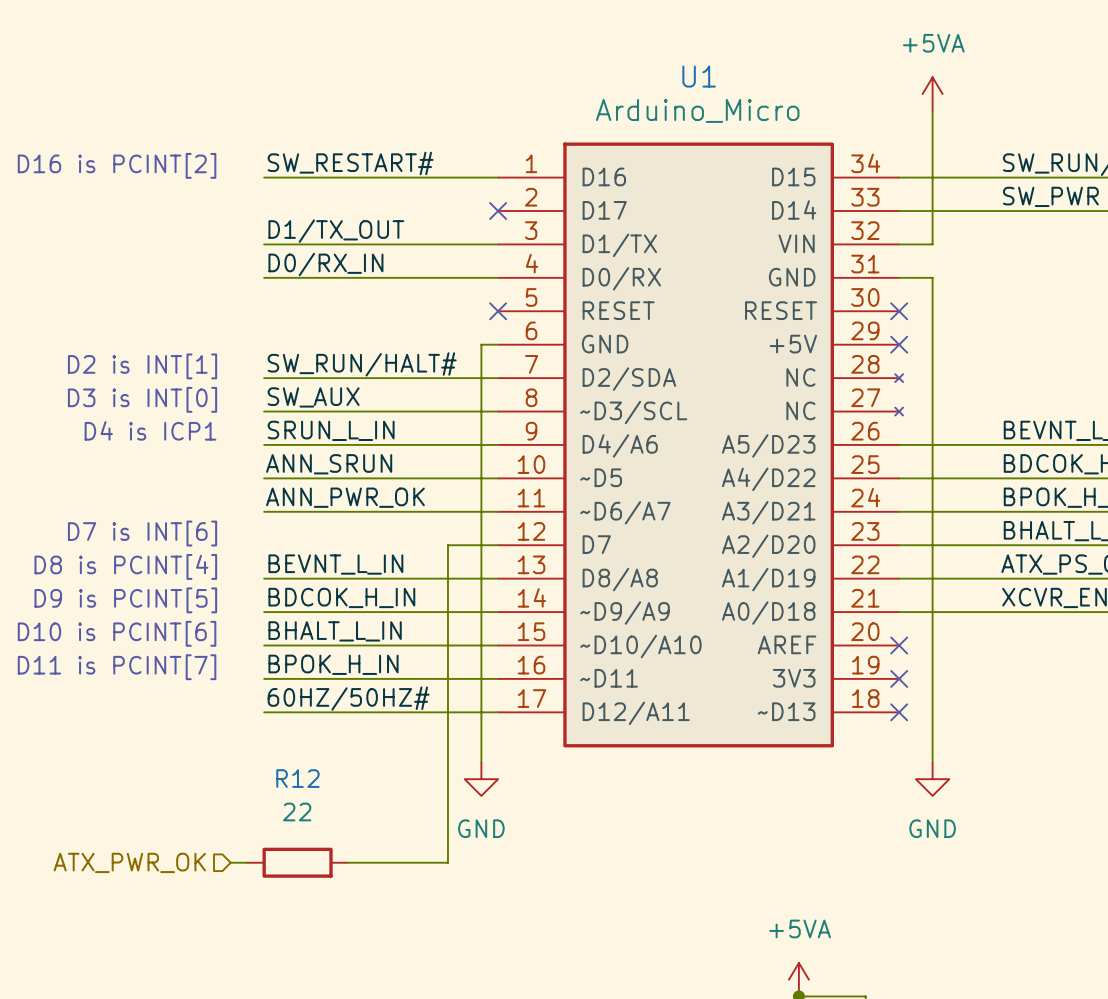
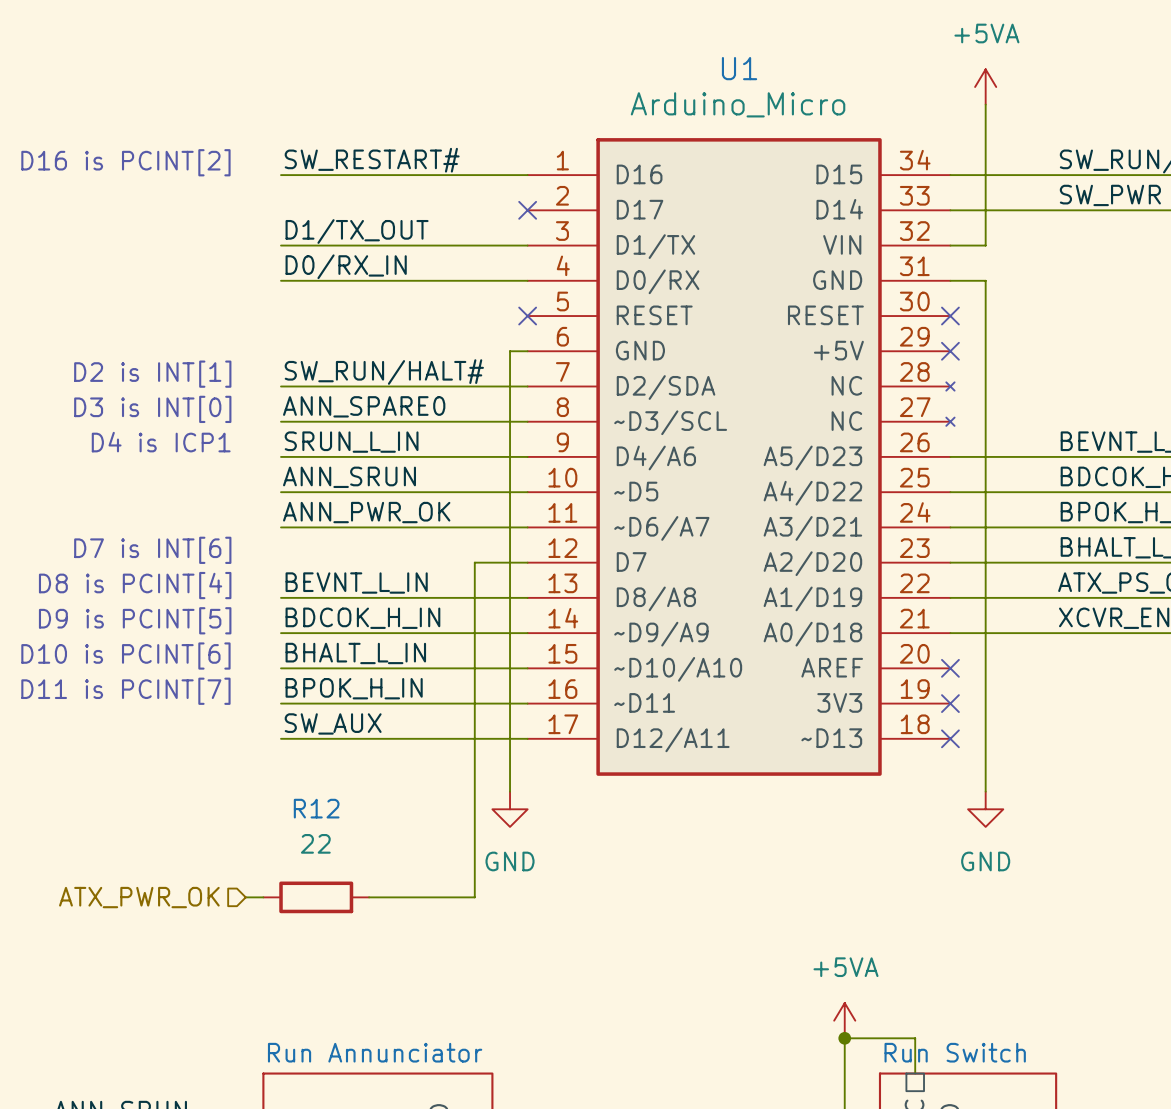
label: SW_AUX (313, 397) -> ANN_SPARE0 (364, 406)
label: 60HZ/50HZ# (348, 698) -> SW_AUX (333, 723)

